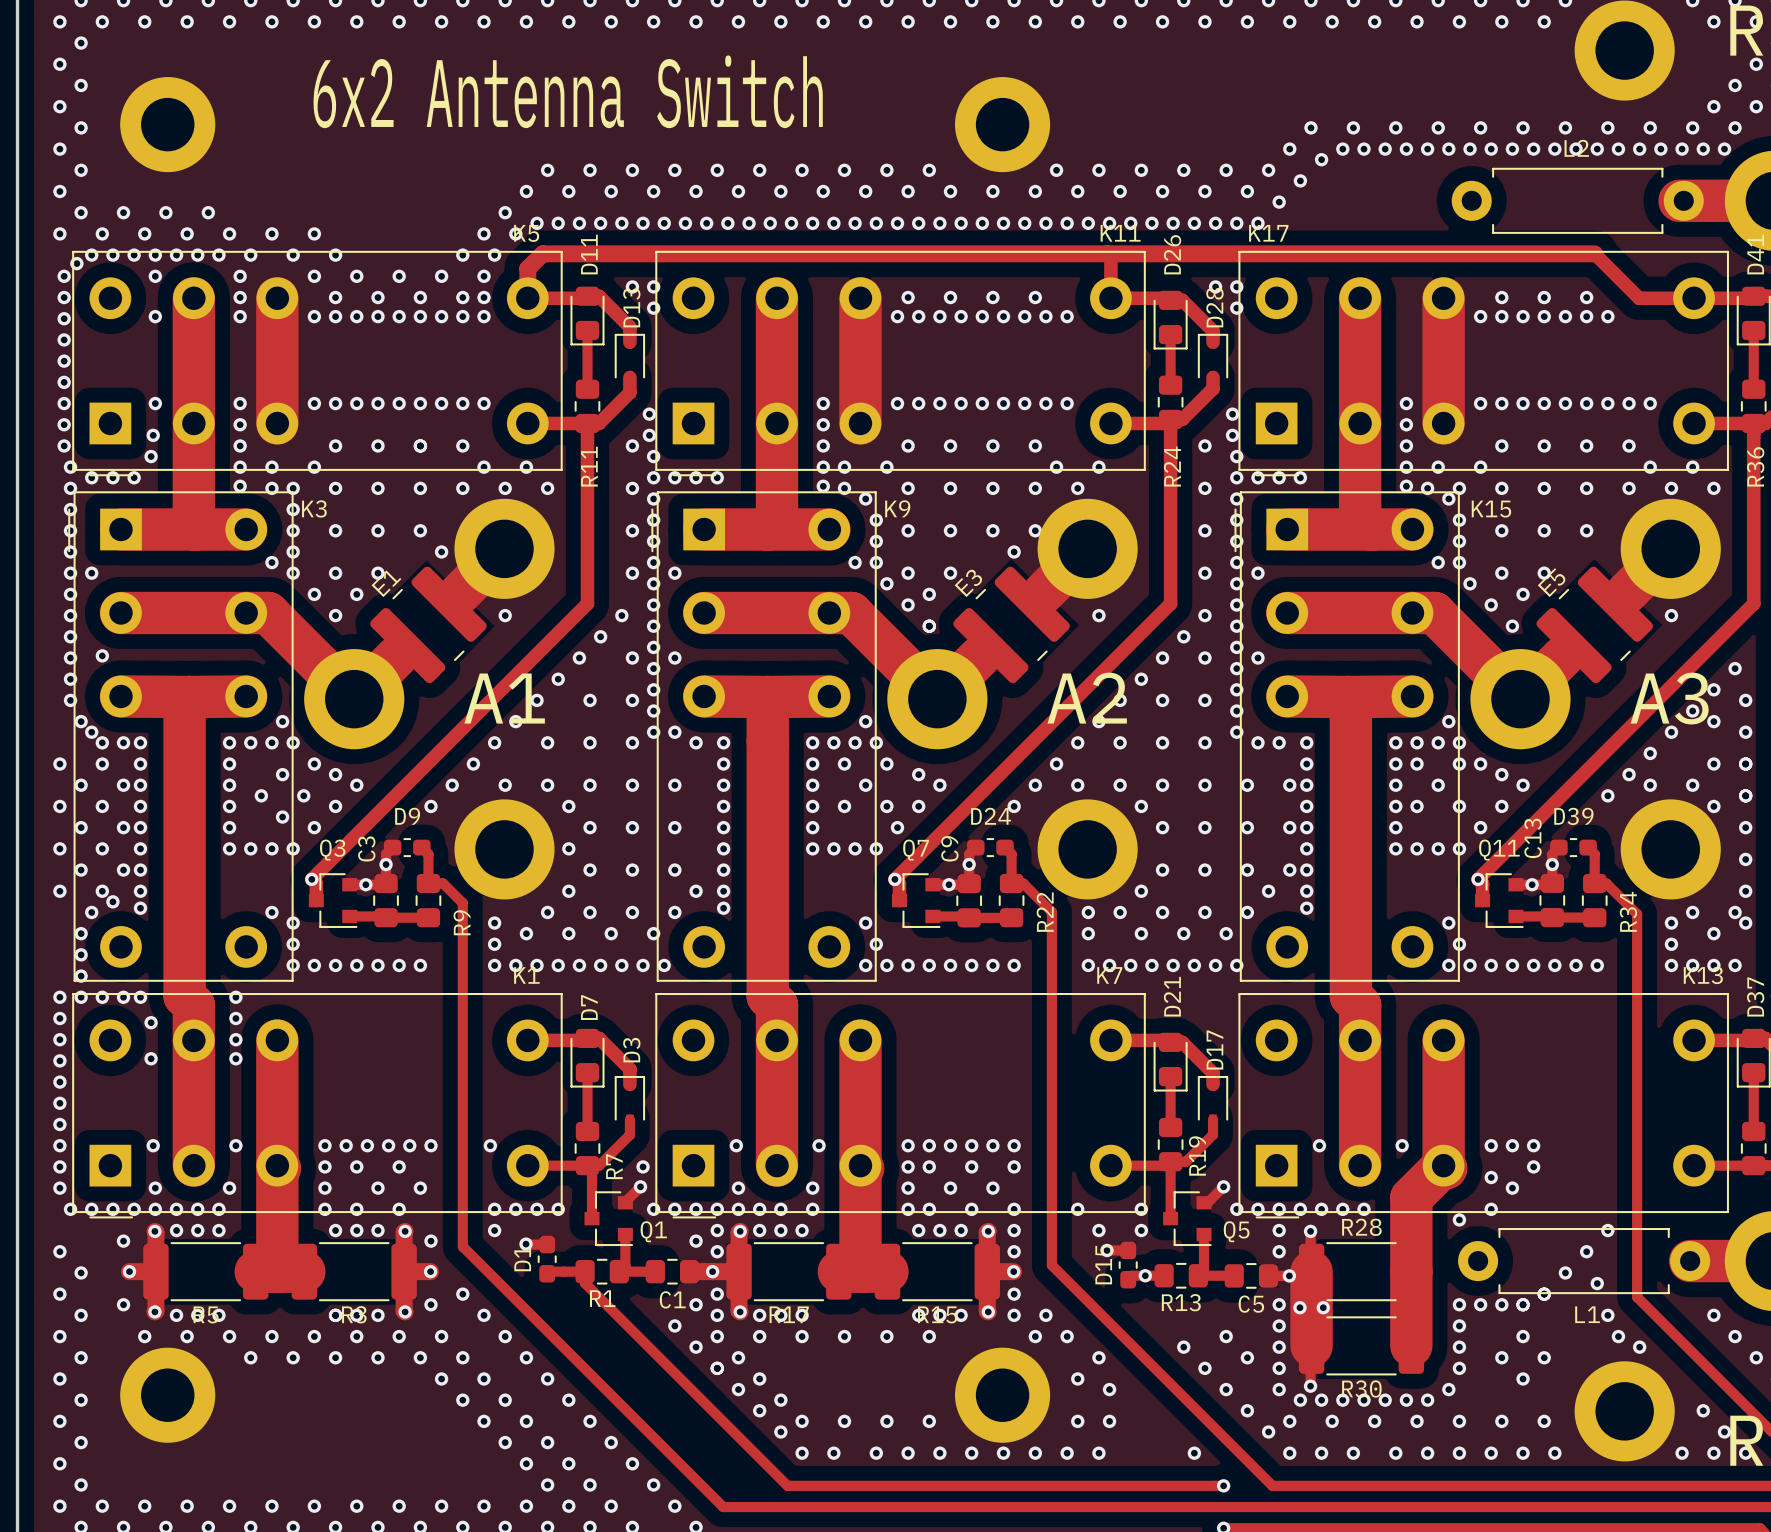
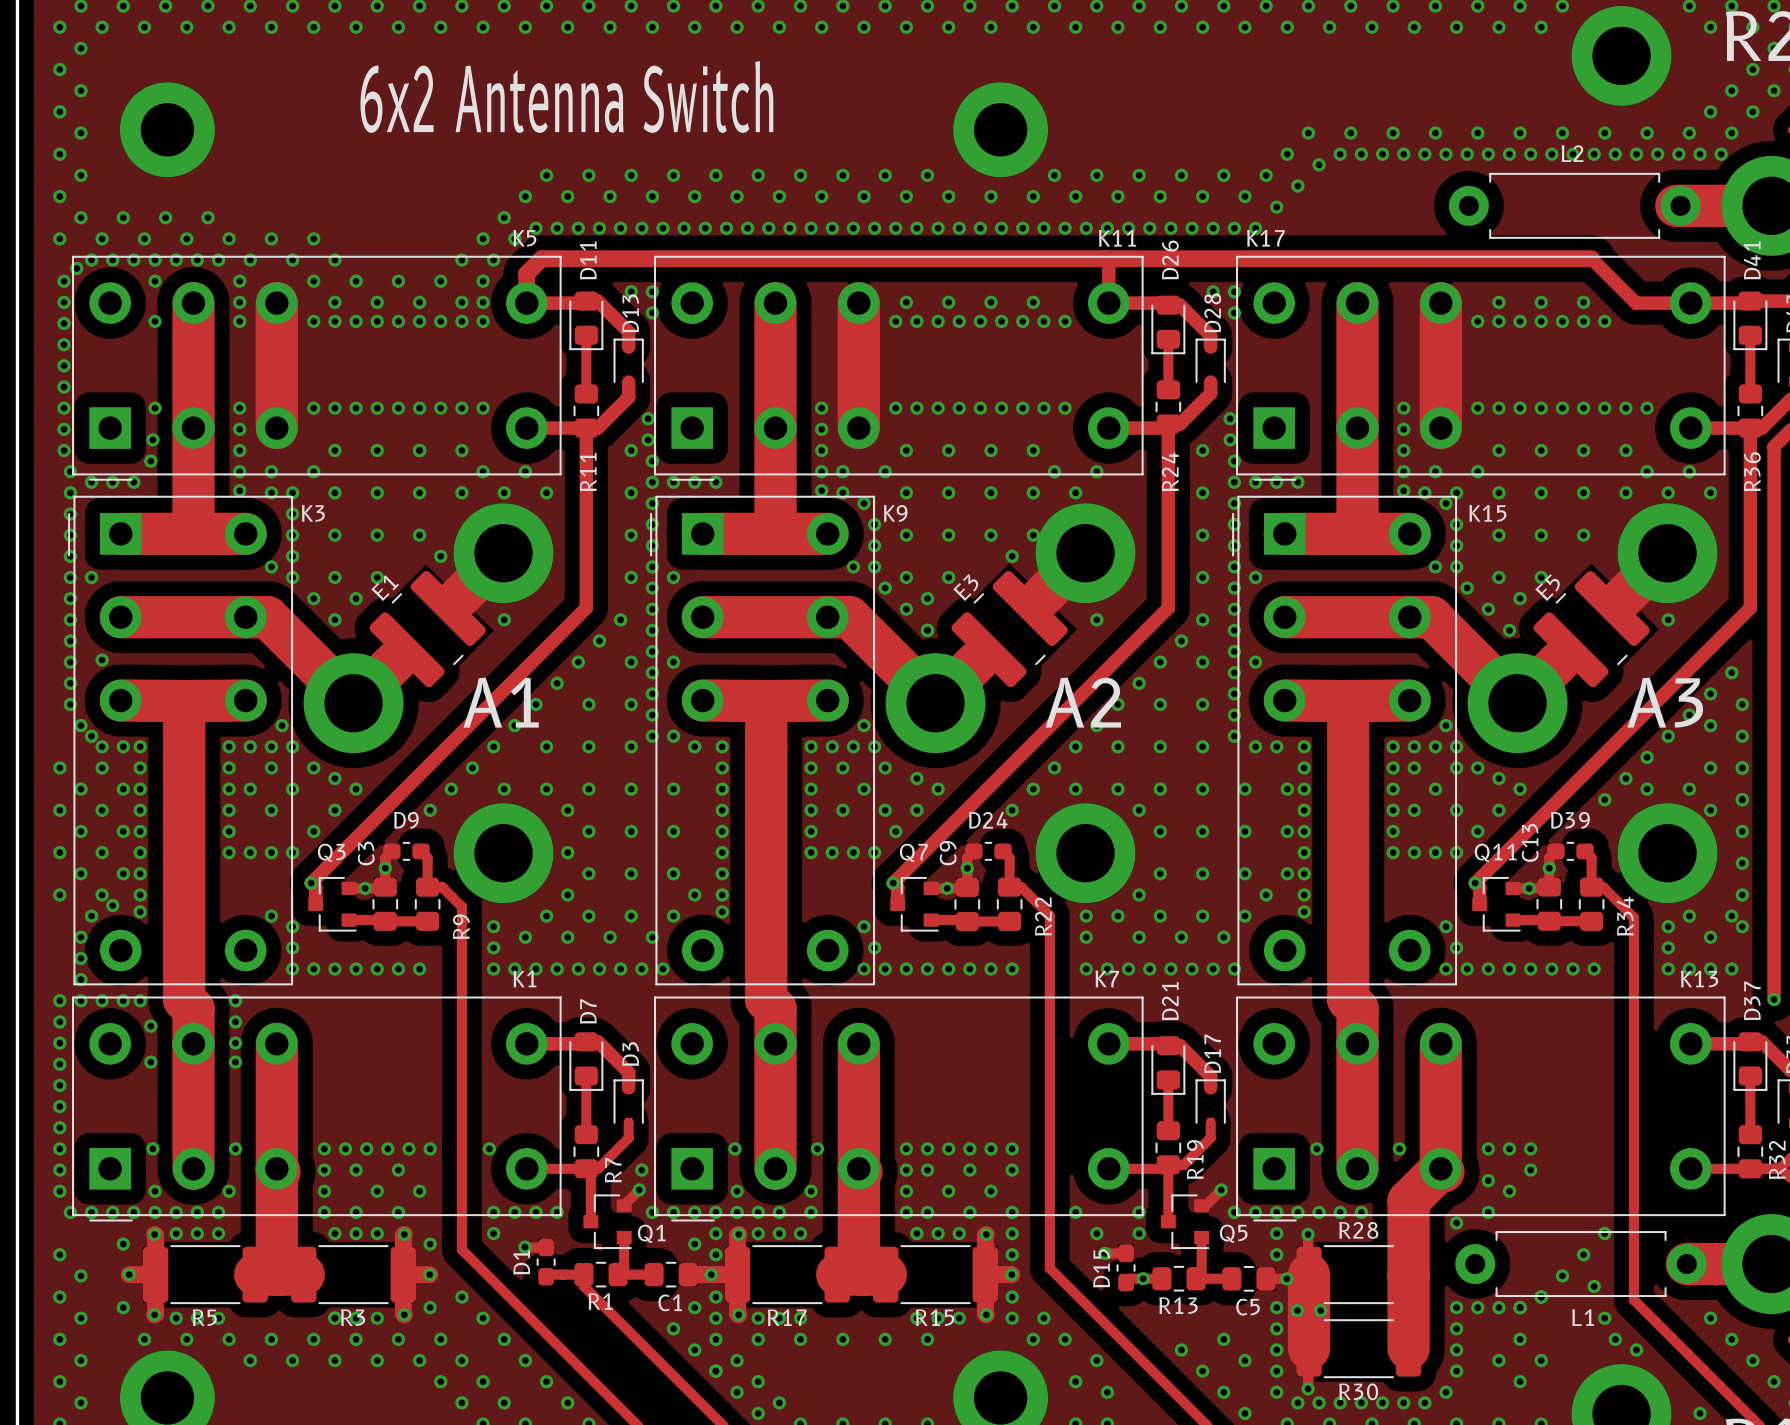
via: none -> (271, 767)
via: (282, 774) -> none
via: none -> (250, 789)
via: none -> (292, 789)
via: (261, 795) -> none
via: (303, 795) -> none
via: none -> (271, 810)
via: (282, 817) -> none

